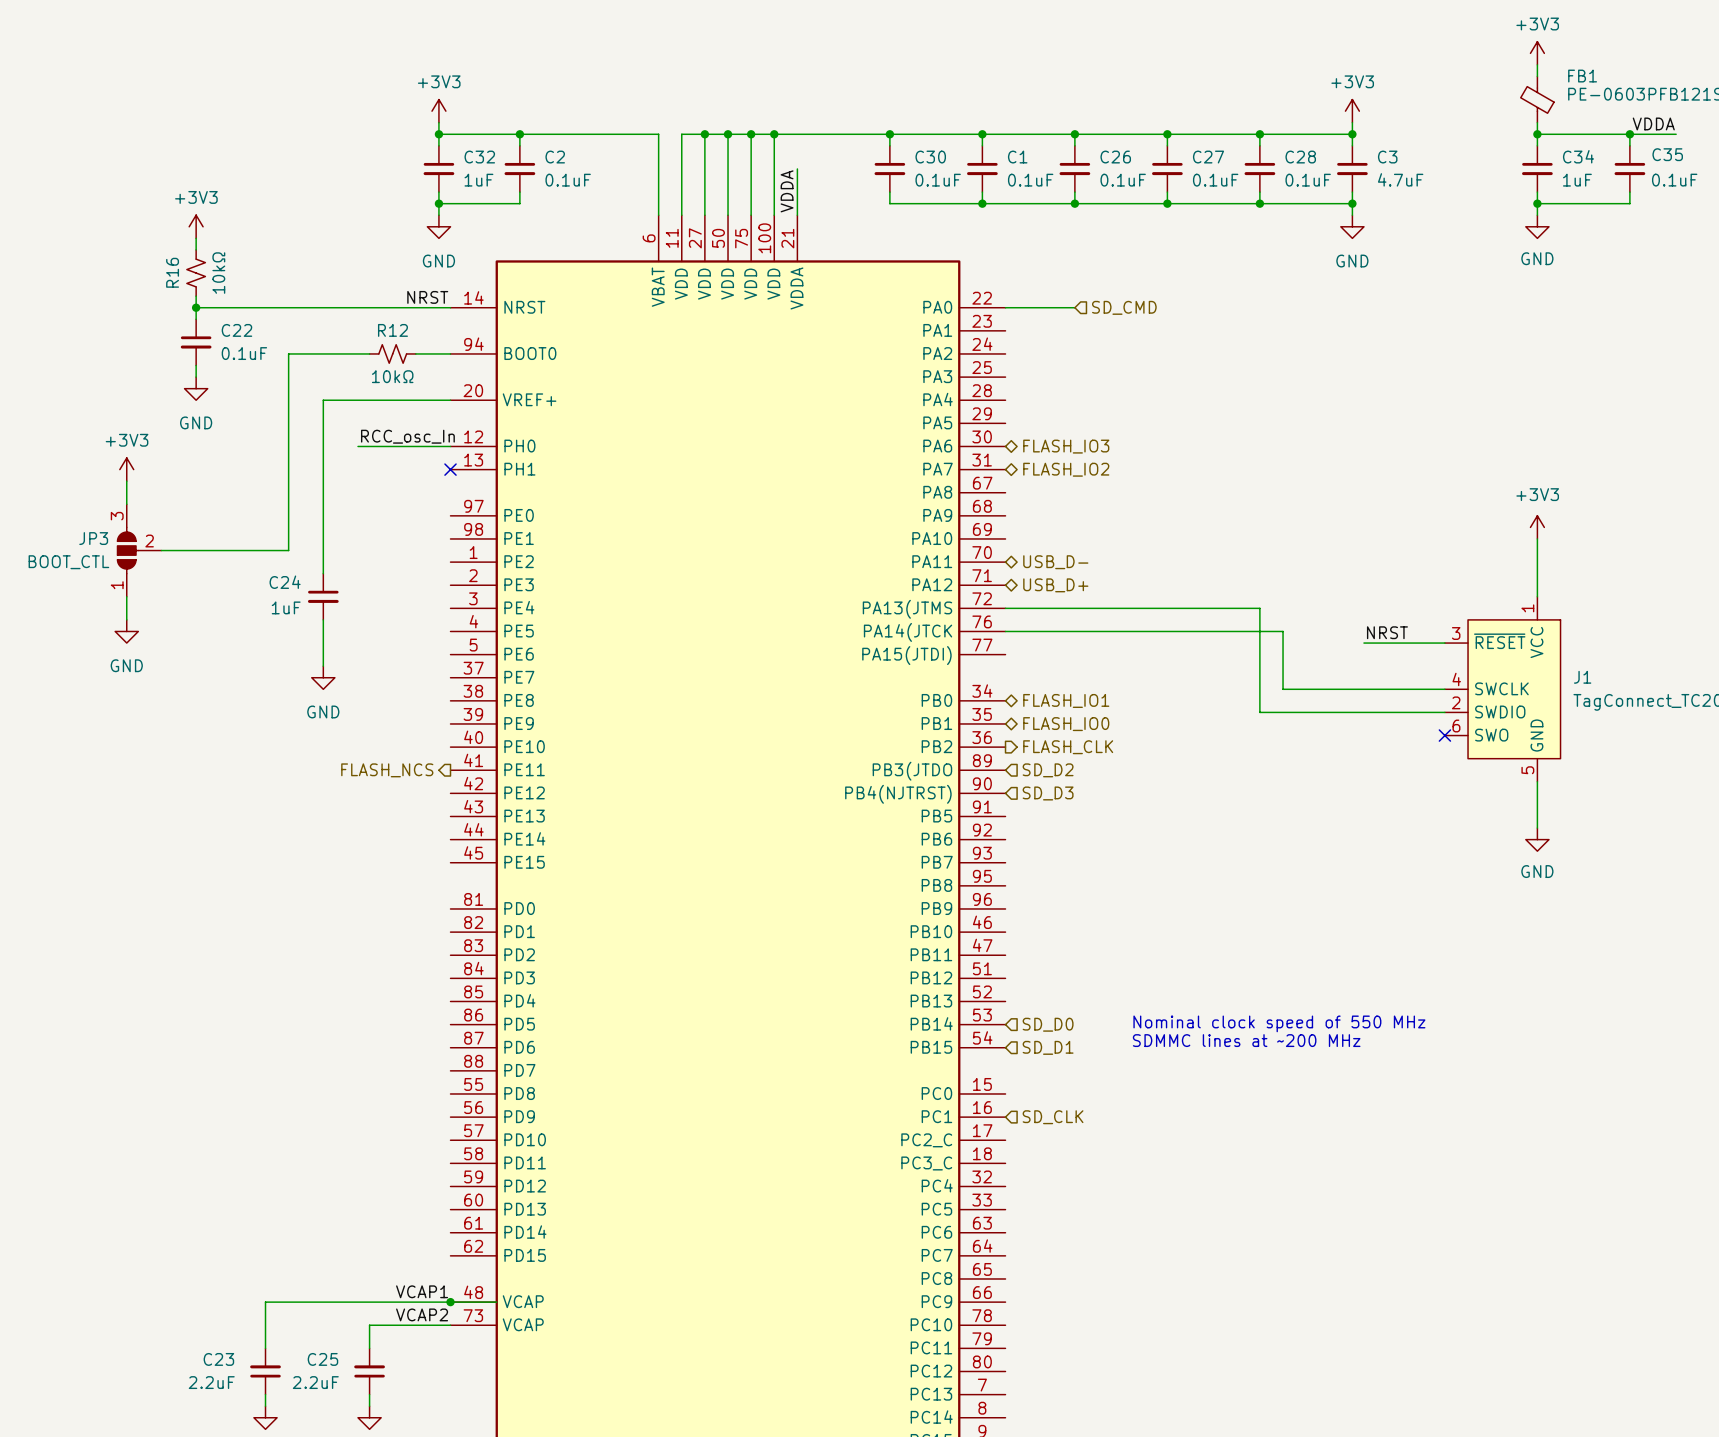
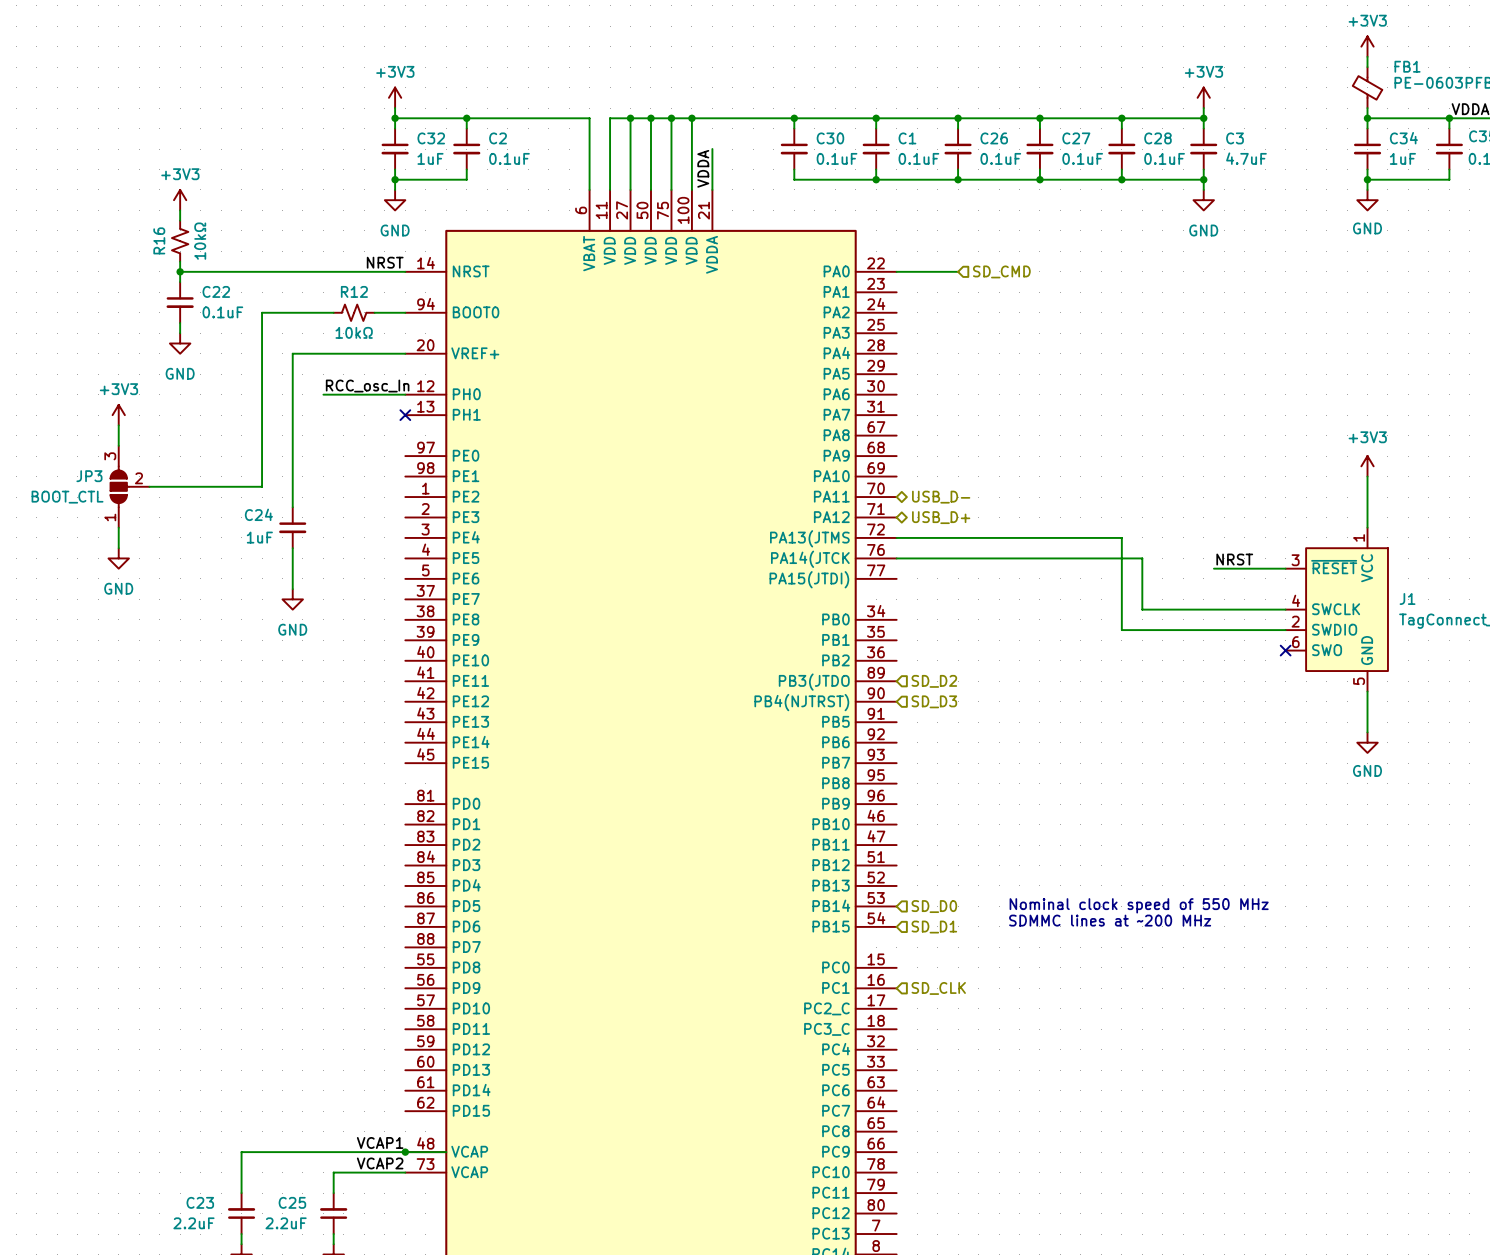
hierarchical label: FLASH_IO3 (1066, 446) -> none
hierarchical label: FLASH_IO2 (1066, 469) -> none
hierarchical label: FLASH_IO1 (1066, 700) -> none
hierarchical label: FLASH_IO0 (1066, 724) -> none
hierarchical label: FLASH_CLK (1068, 747) -> none
hierarchical label: FLASH_NCS (387, 770) -> none

